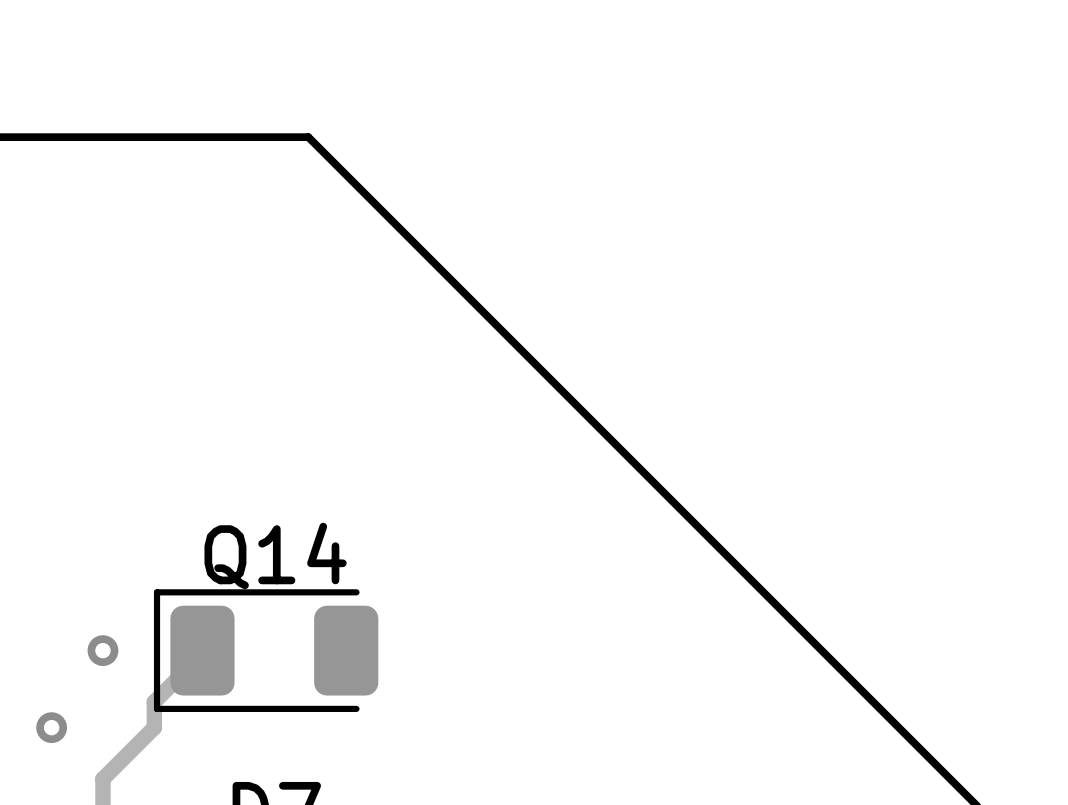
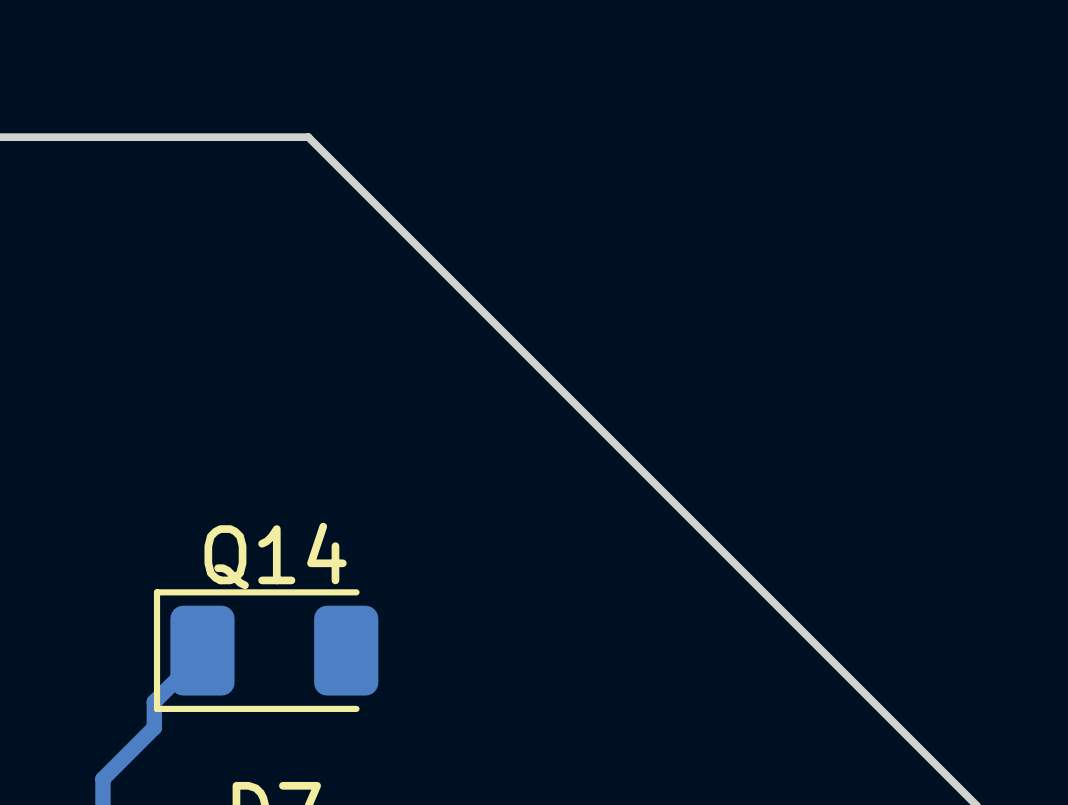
via: (102, 650) -> none
via: (51, 727) -> none

